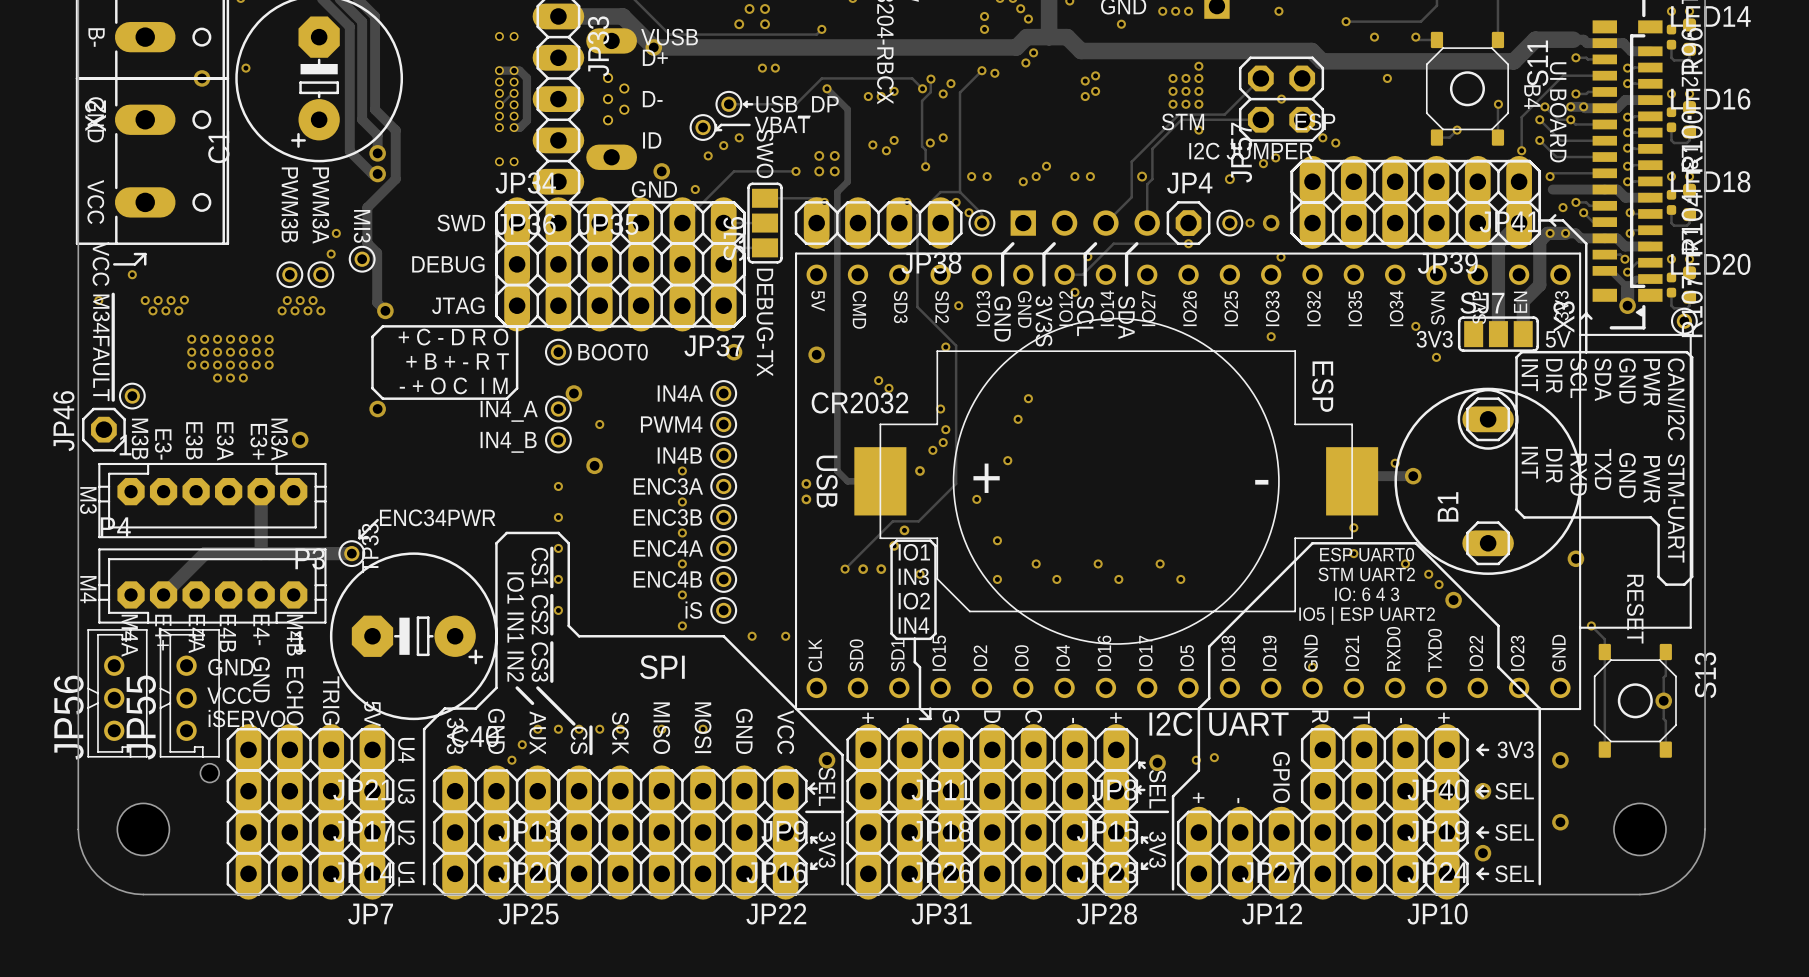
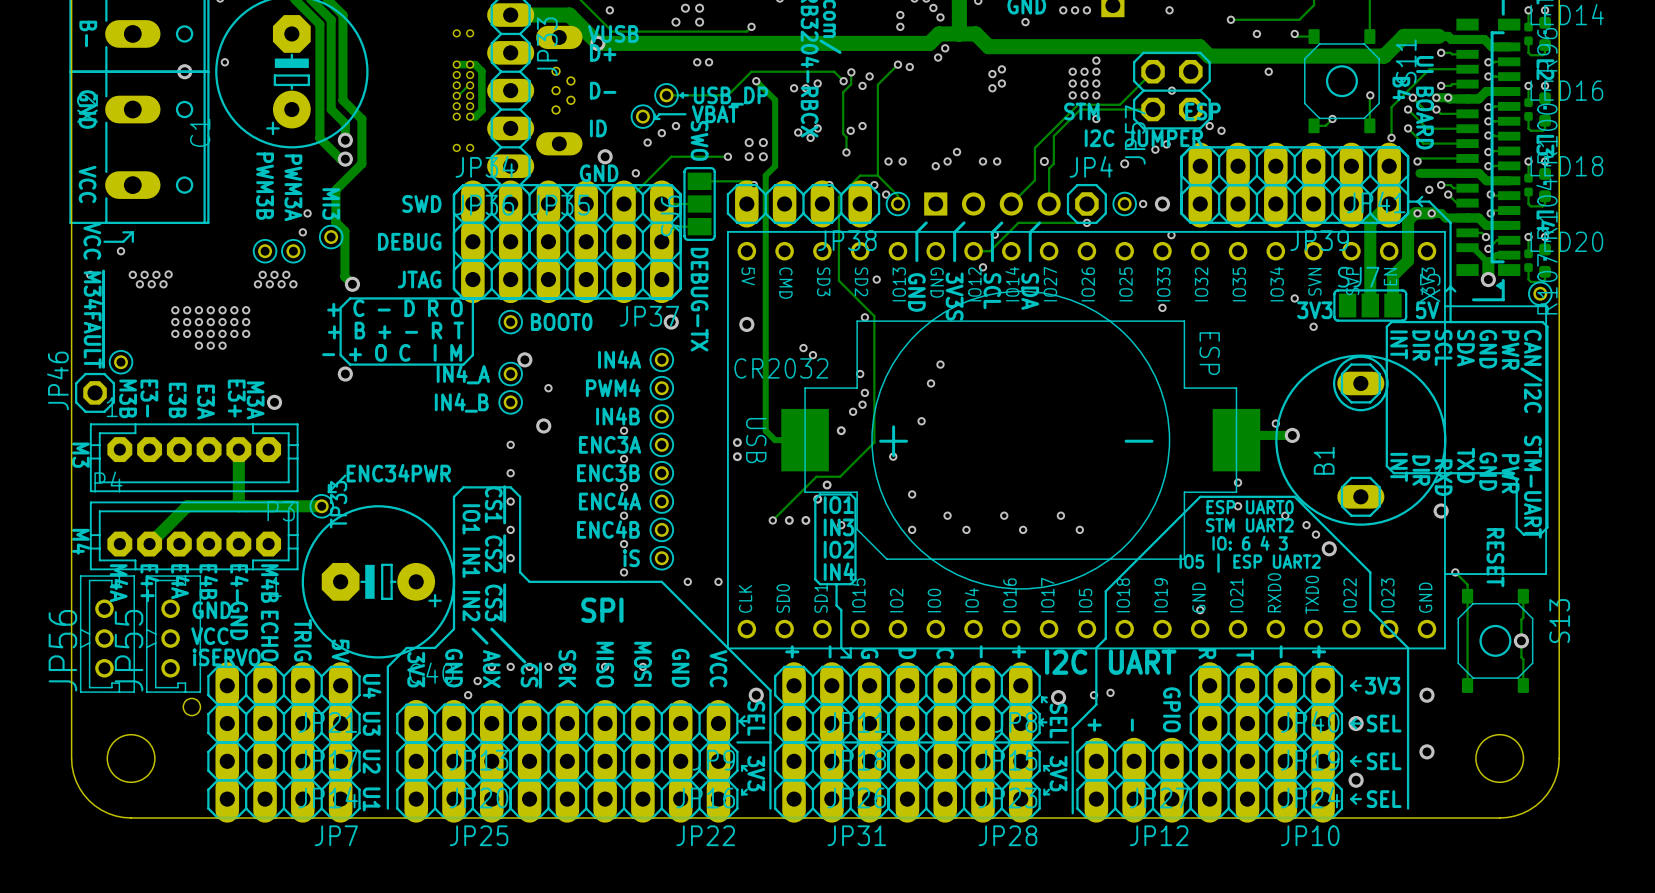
via: none -> (609, 10)

